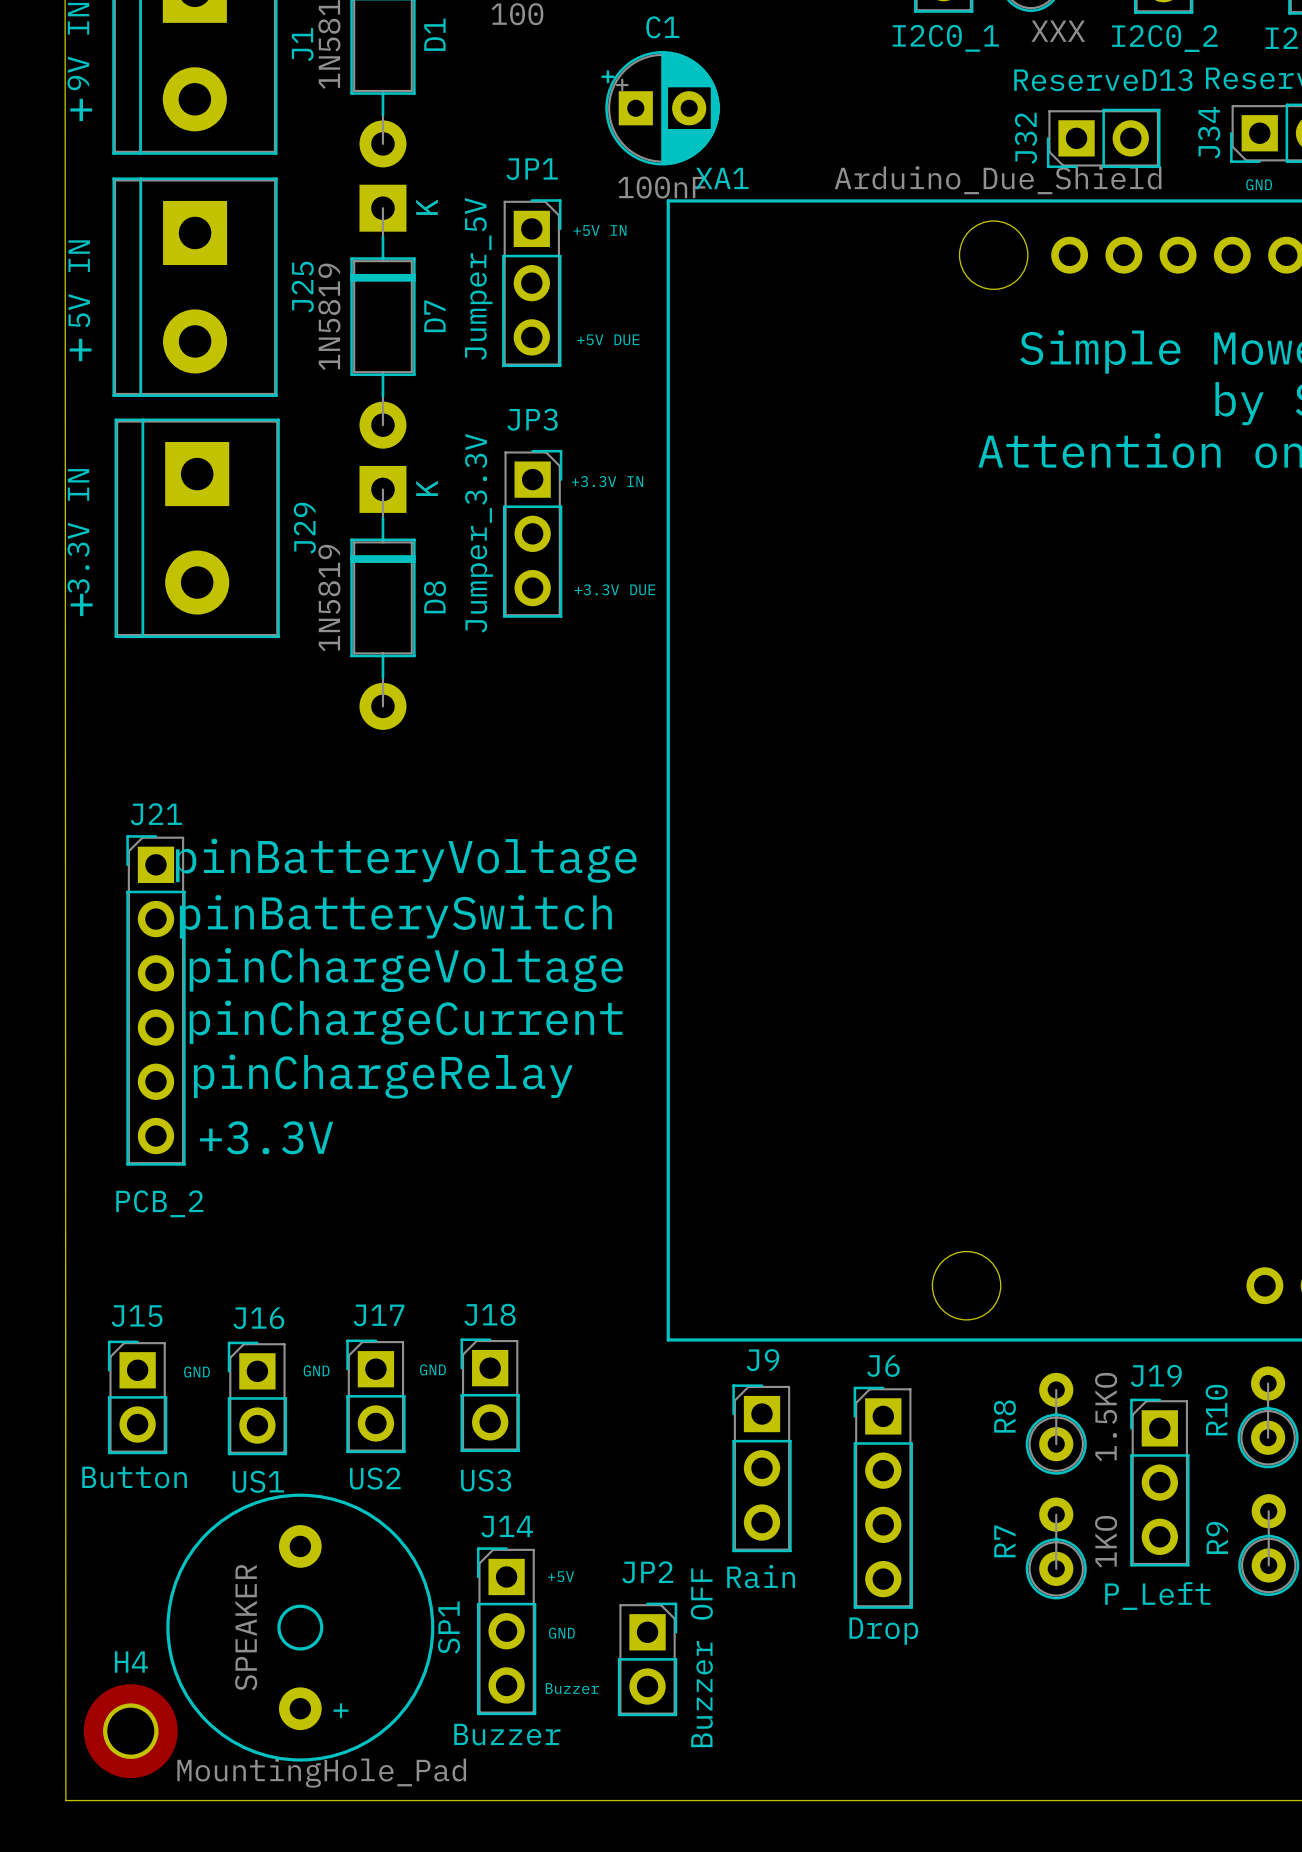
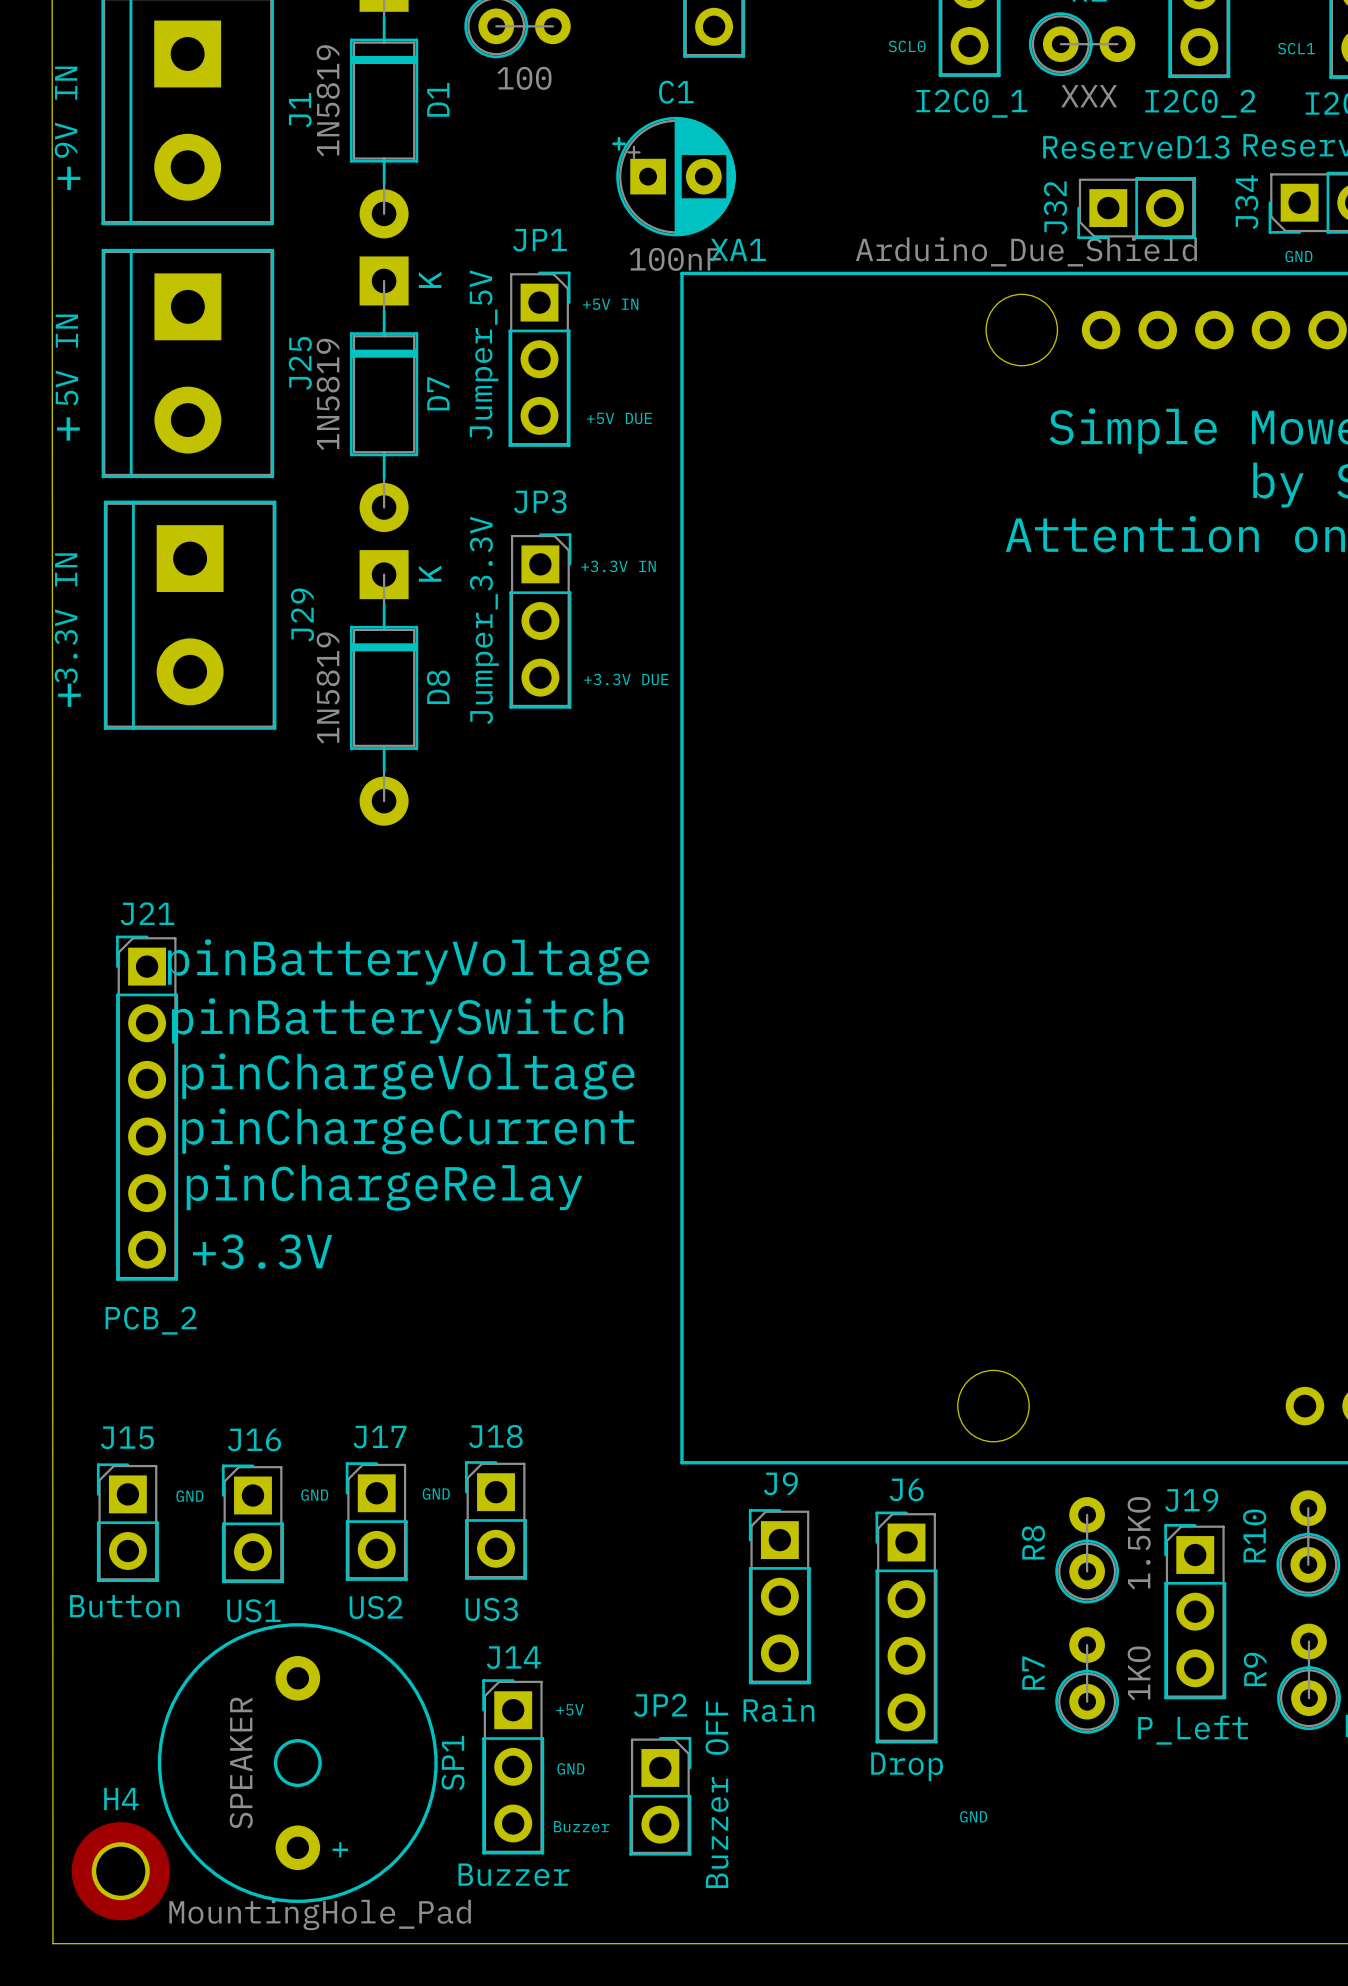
text: none -> GND (973, 1816)

